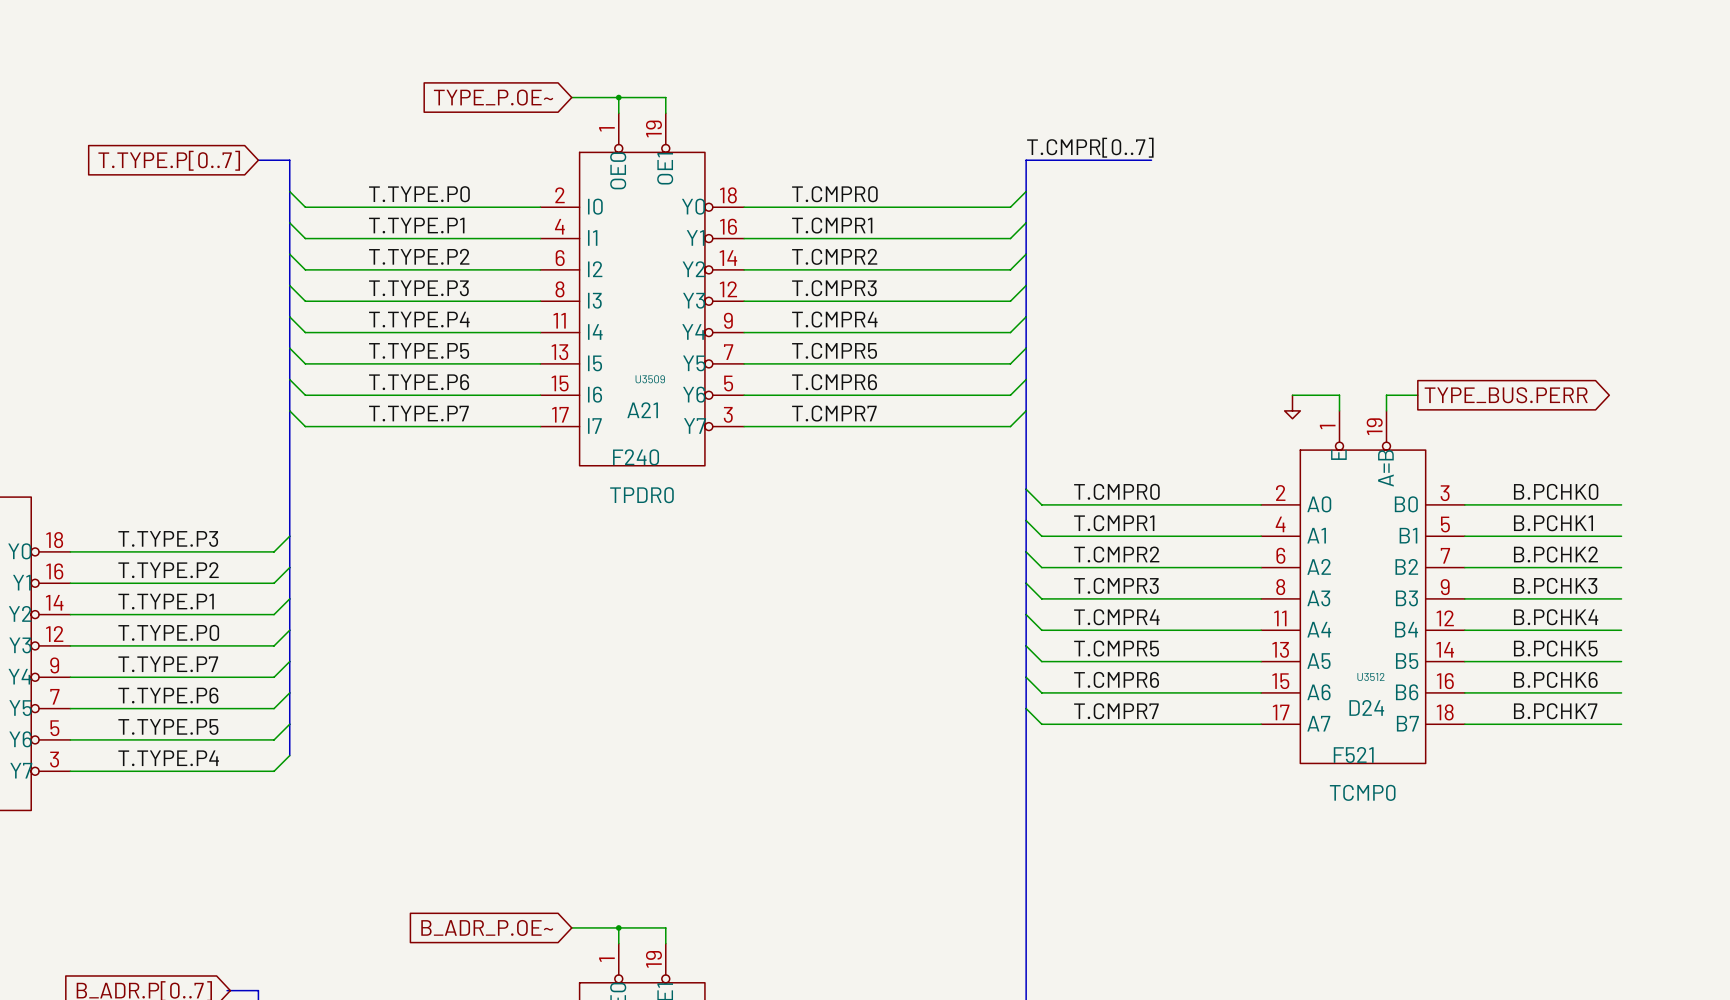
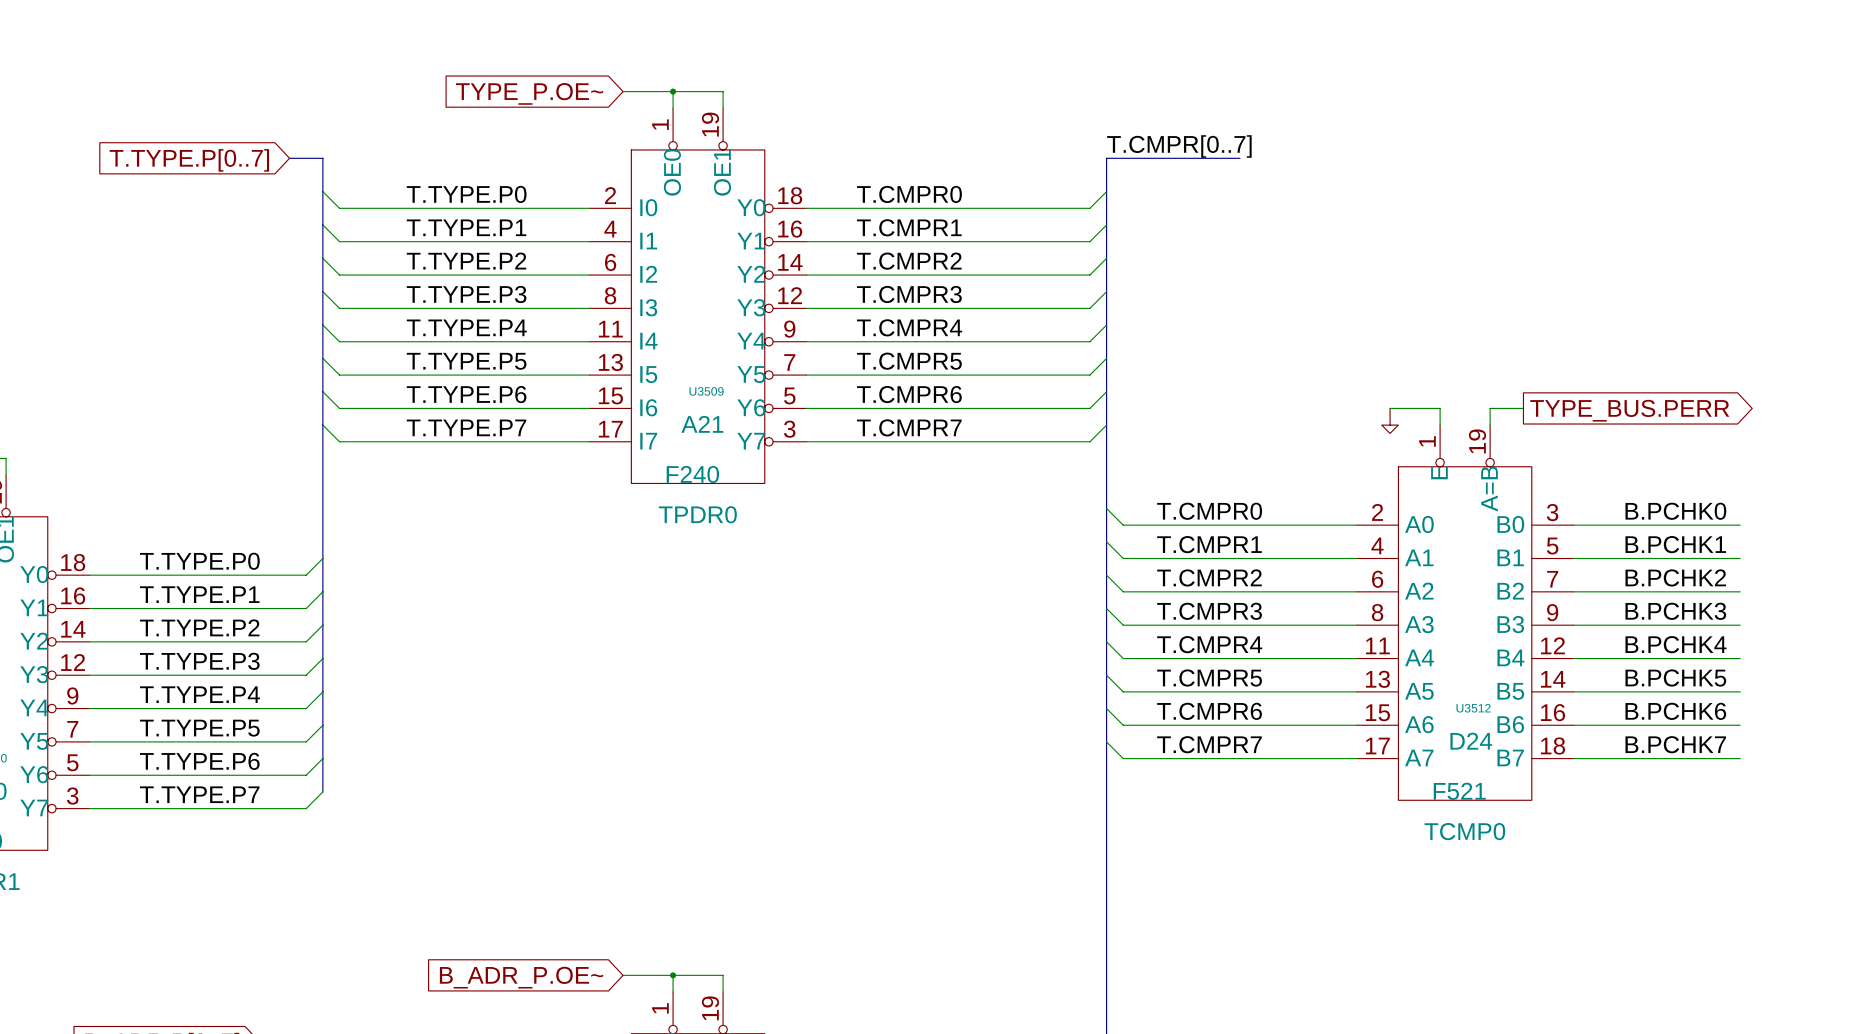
label: T.TYPE.P3 (168, 538) -> T.TYPE.P0 (199, 561)
label: T.TYPE.P2 (168, 570) -> T.TYPE.P1 (199, 594)
label: T.TYPE.P1 (166, 601) -> T.TYPE.P2 (199, 627)
label: T.TYPE.P0 (168, 632) -> T.TYPE.P3 (199, 661)
label: T.TYPE.P7 (168, 664) -> T.TYPE.P4 (199, 694)
label: T.TYPE.P6 (168, 695) -> T.TYPE.P5 (199, 728)
label: T.TYPE.P5 (168, 726) -> T.TYPE.P6 (199, 761)
label: T.TYPE.P4 (168, 758) -> T.TYPE.P7 (199, 794)

